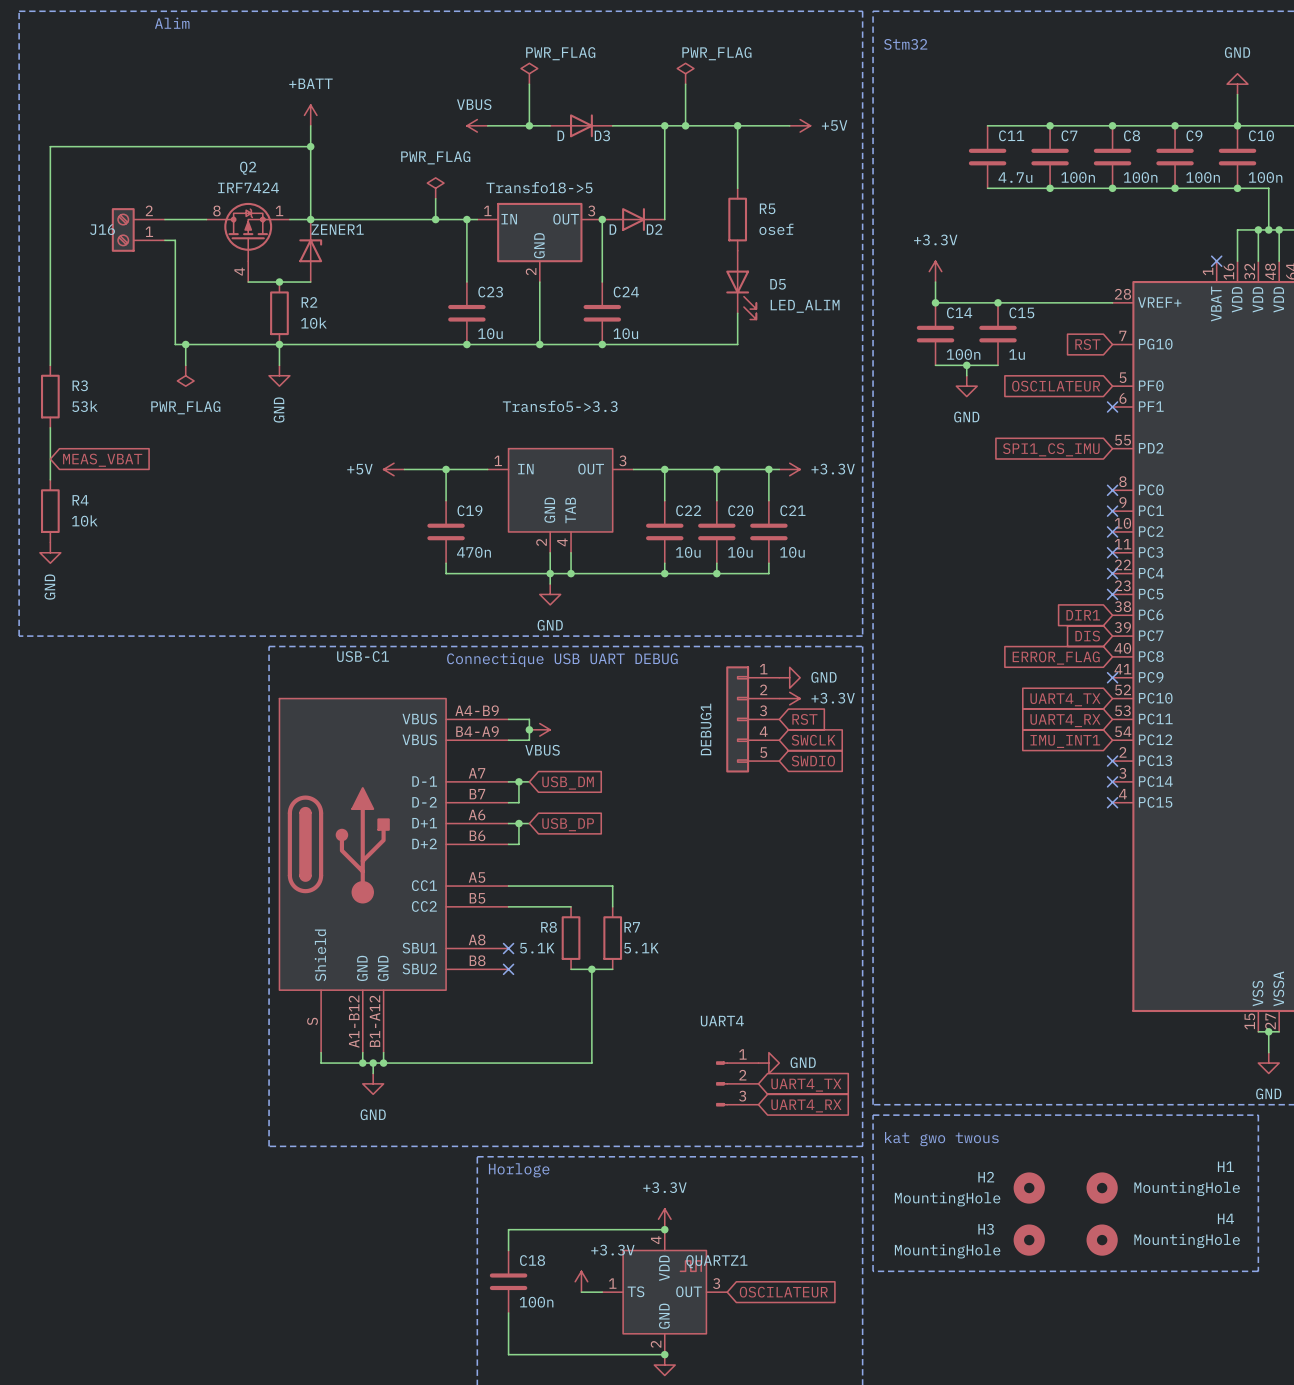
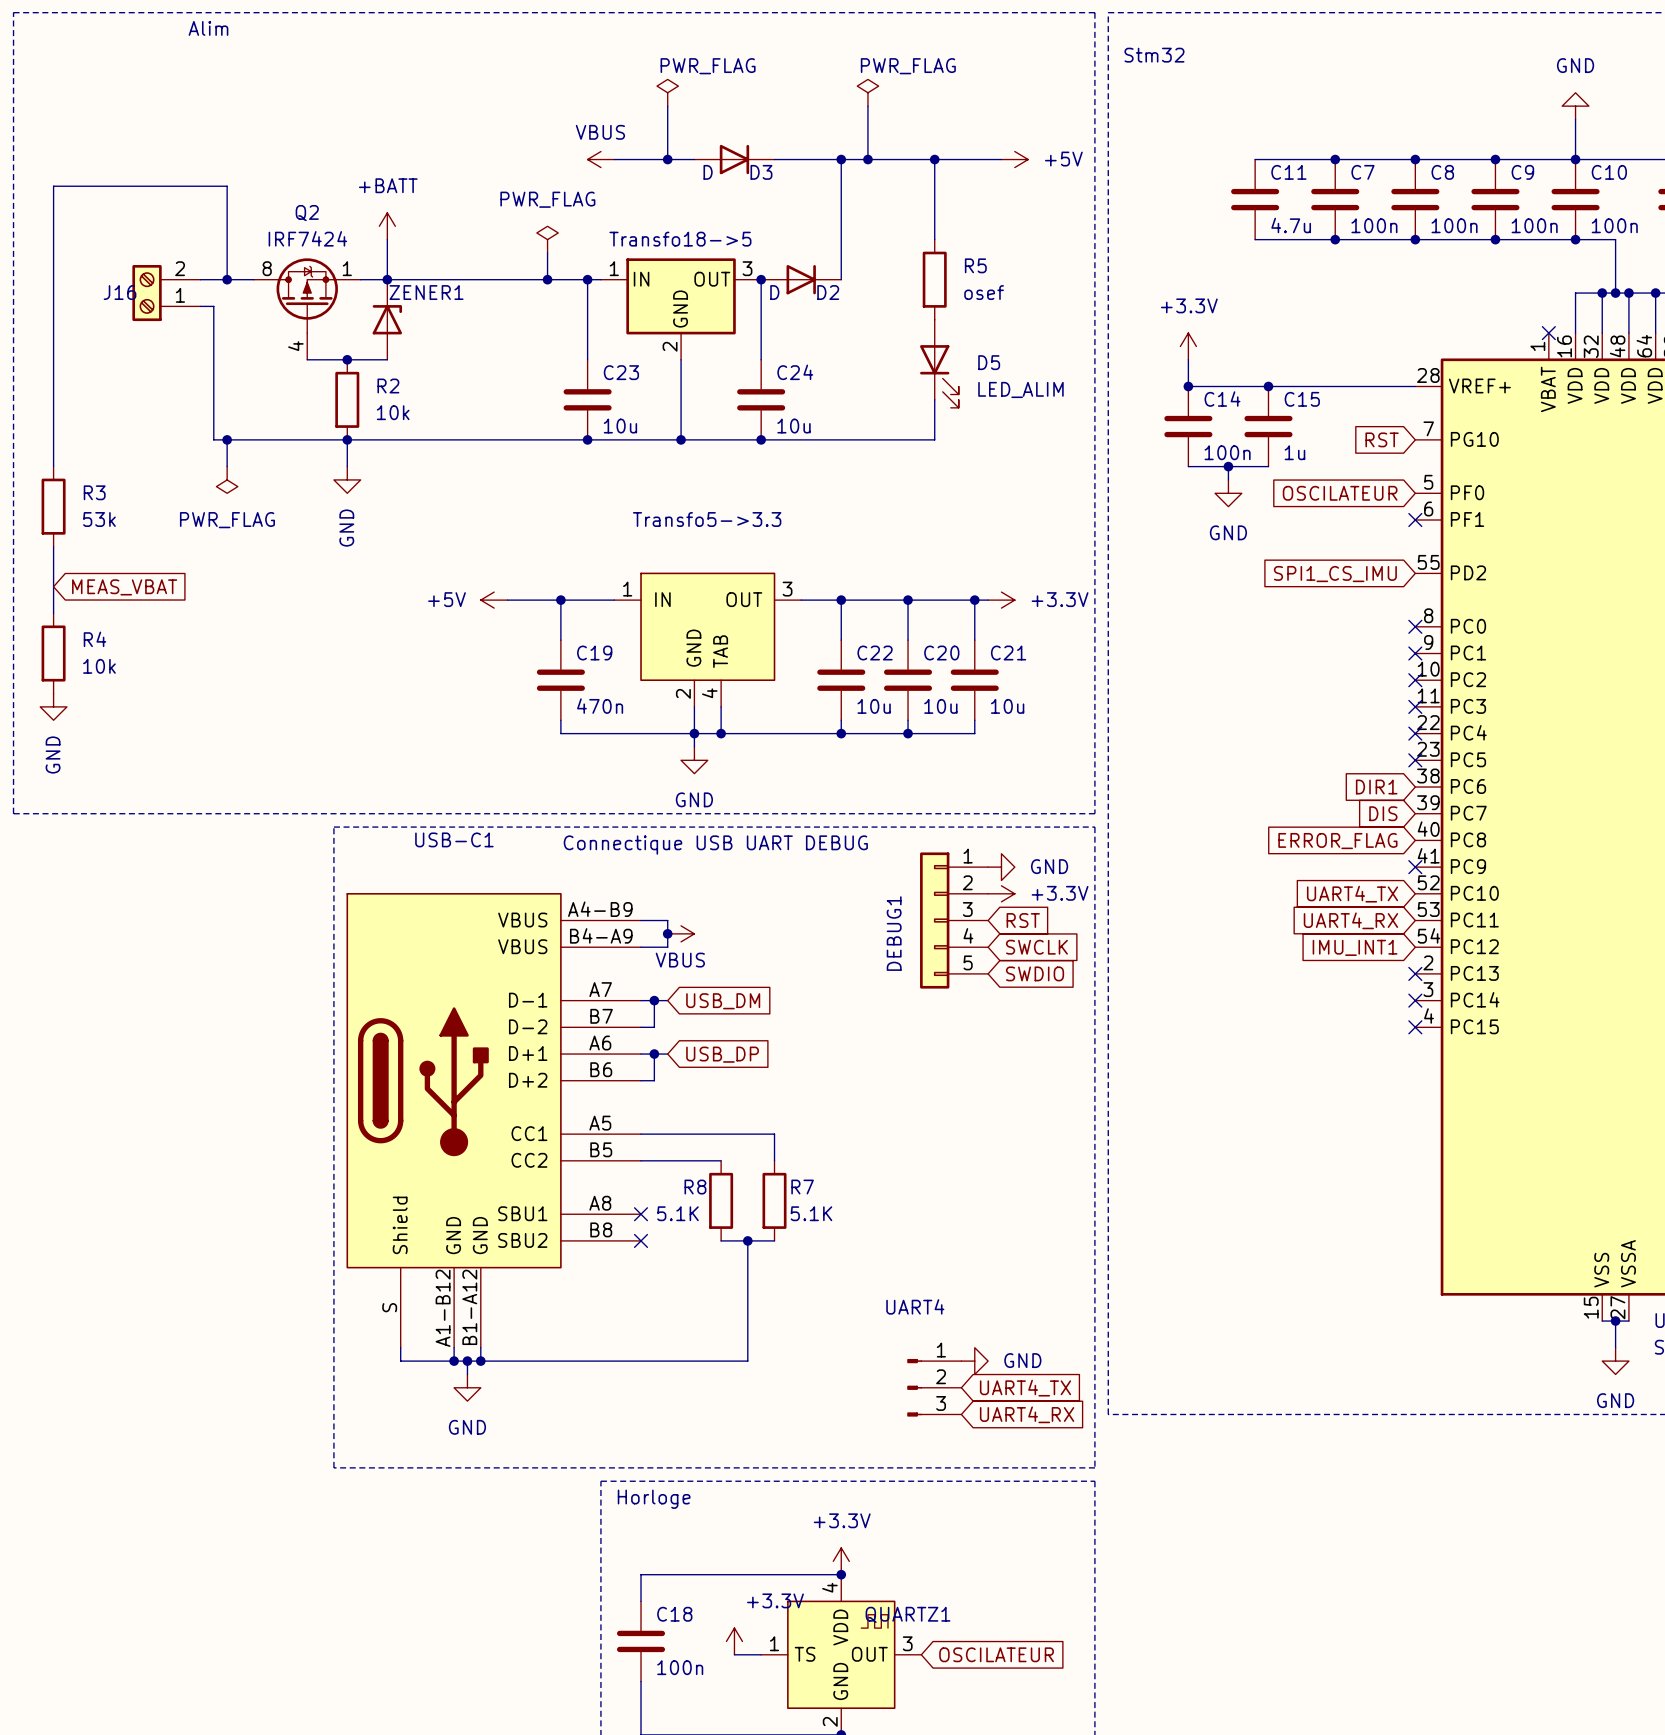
power symbol position: +BATT (310, 115) -> +BATT (387, 226)
wire: (310, 125) (310, 188) -> none
wire: (185, 146) (310, 146) -> (227, 186) (227, 279)
junction: (310, 146) -> none
junction: none -> (227, 279)
line: (873, 1115) (1258, 1115) (1258, 1271) (873, 1271) (873, 1115) -> none
text: kat gwo twous (941, 1139) -> none
H2: MountingHole (1029, 1188) -> none
H1: MountingHole (1102, 1188) -> none
H3: MountingHole (1029, 1240) -> none
H4: MountingHole (1102, 1240) -> none

